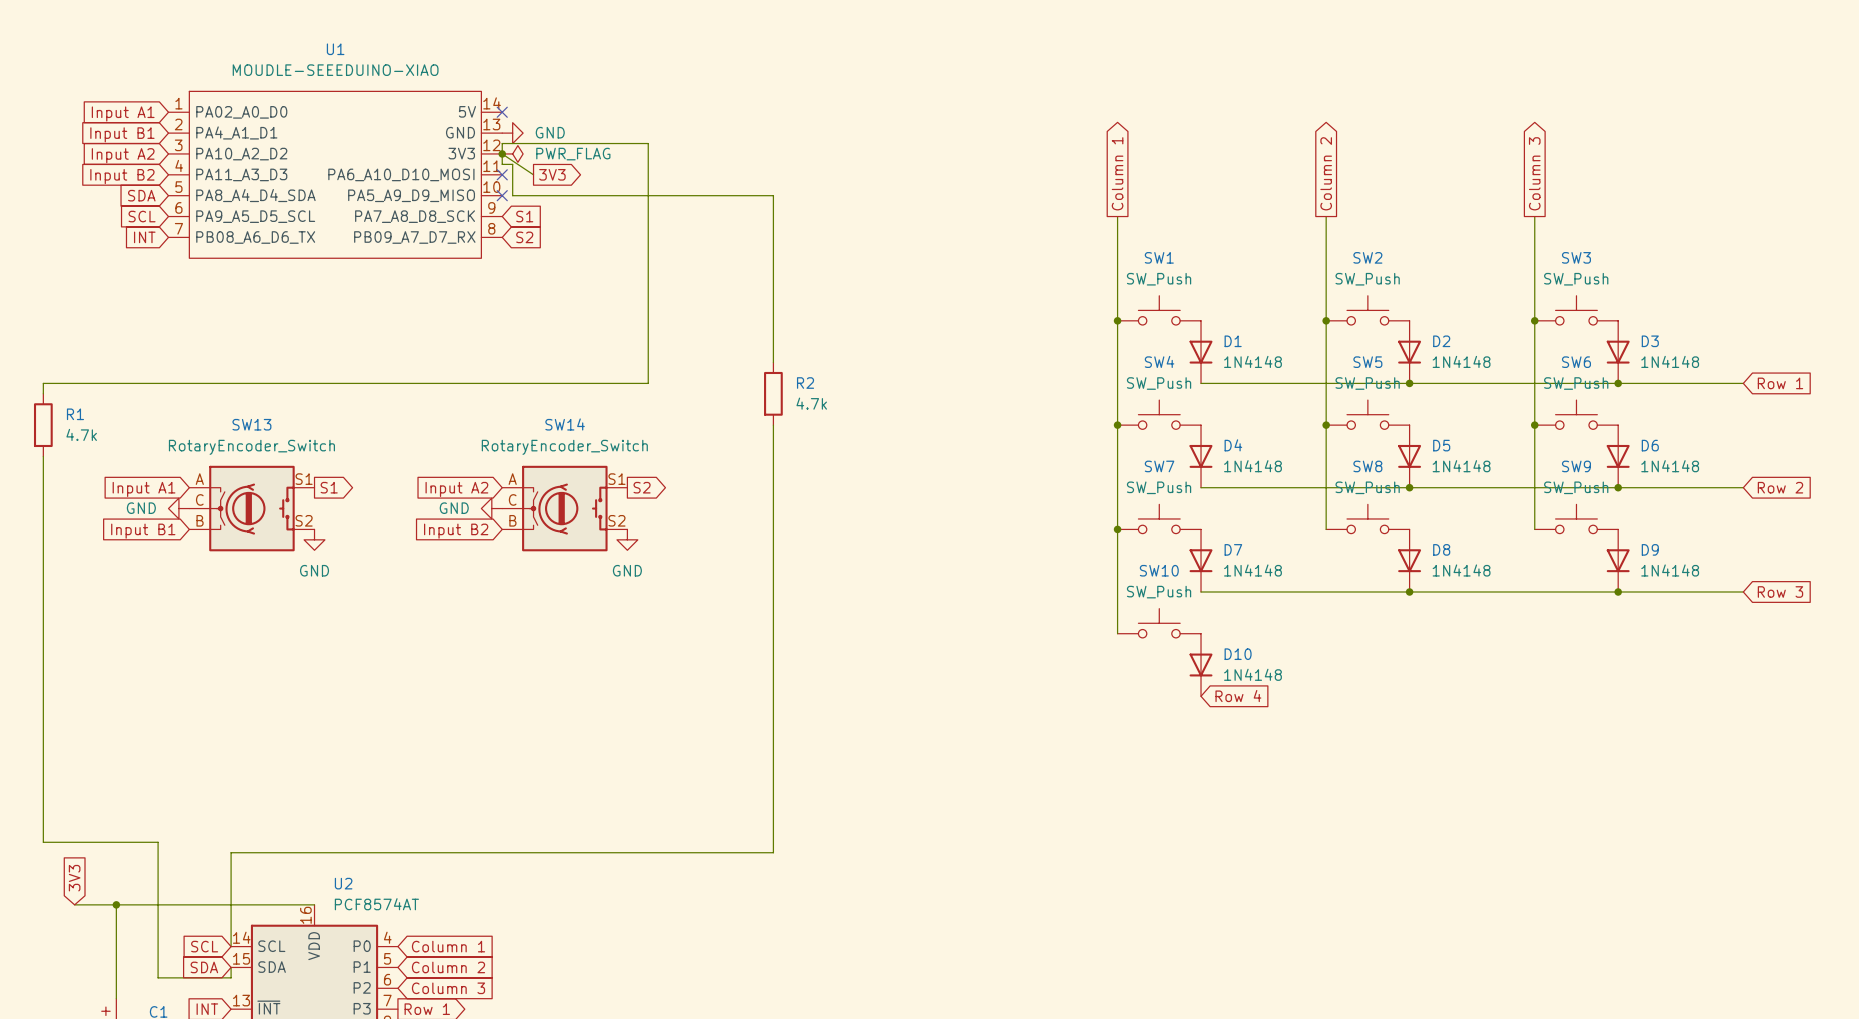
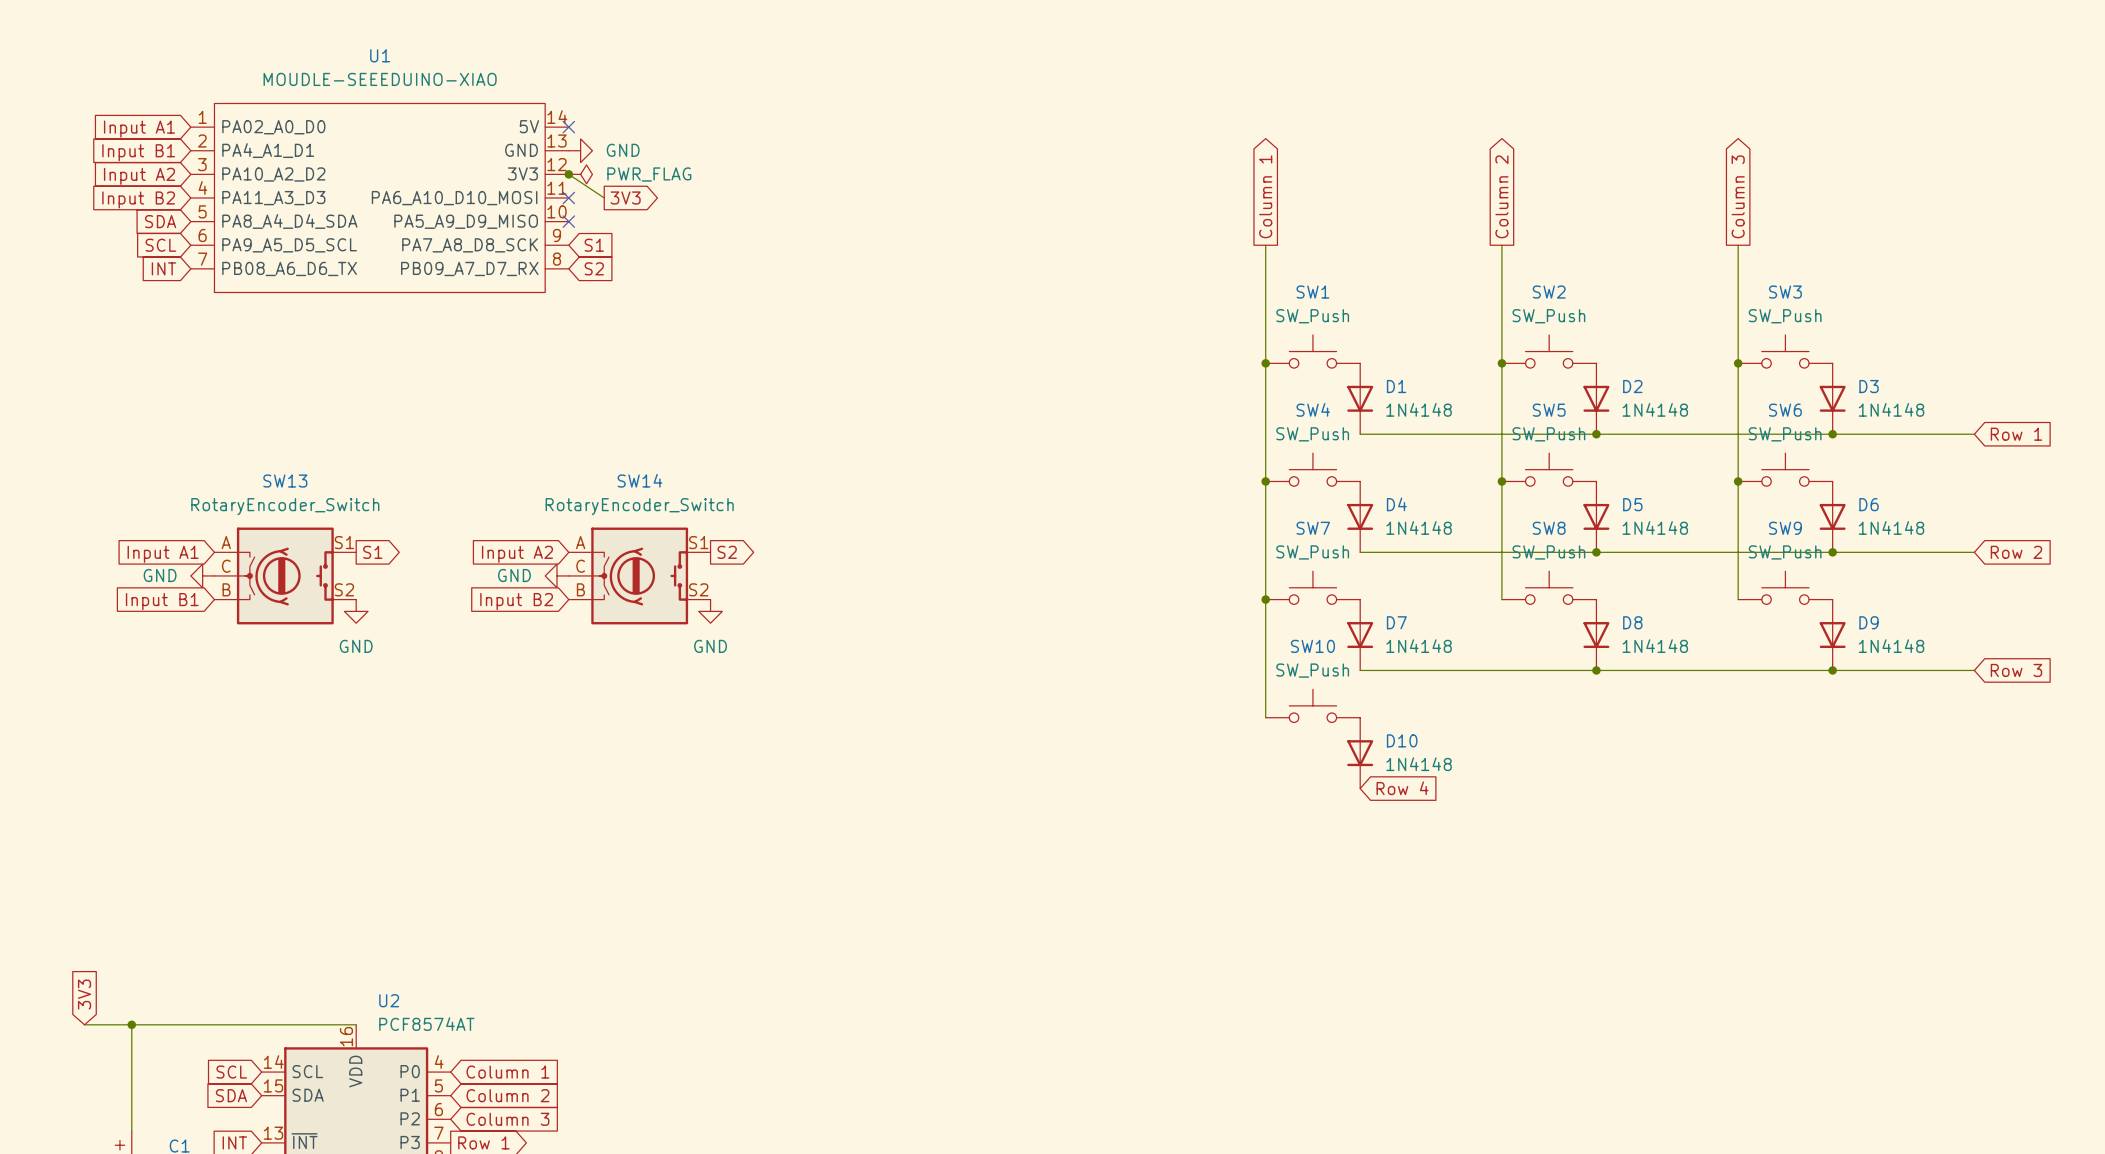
wire: (773, 362) (773, 195) (512, 195) (512, 164) (502, 164) (502, 143) (648, 143) (648, 383) (43, 383) (43, 393) -> none
R2: 4.7k (773, 393) -> none
R1: 4.7k (43, 425) -> none
wire: (773, 425) (773, 852) (231, 852) (231, 946) -> none
wire: (43, 456) (43, 842) (158, 842) (158, 977) (231, 977) (231, 967) -> none

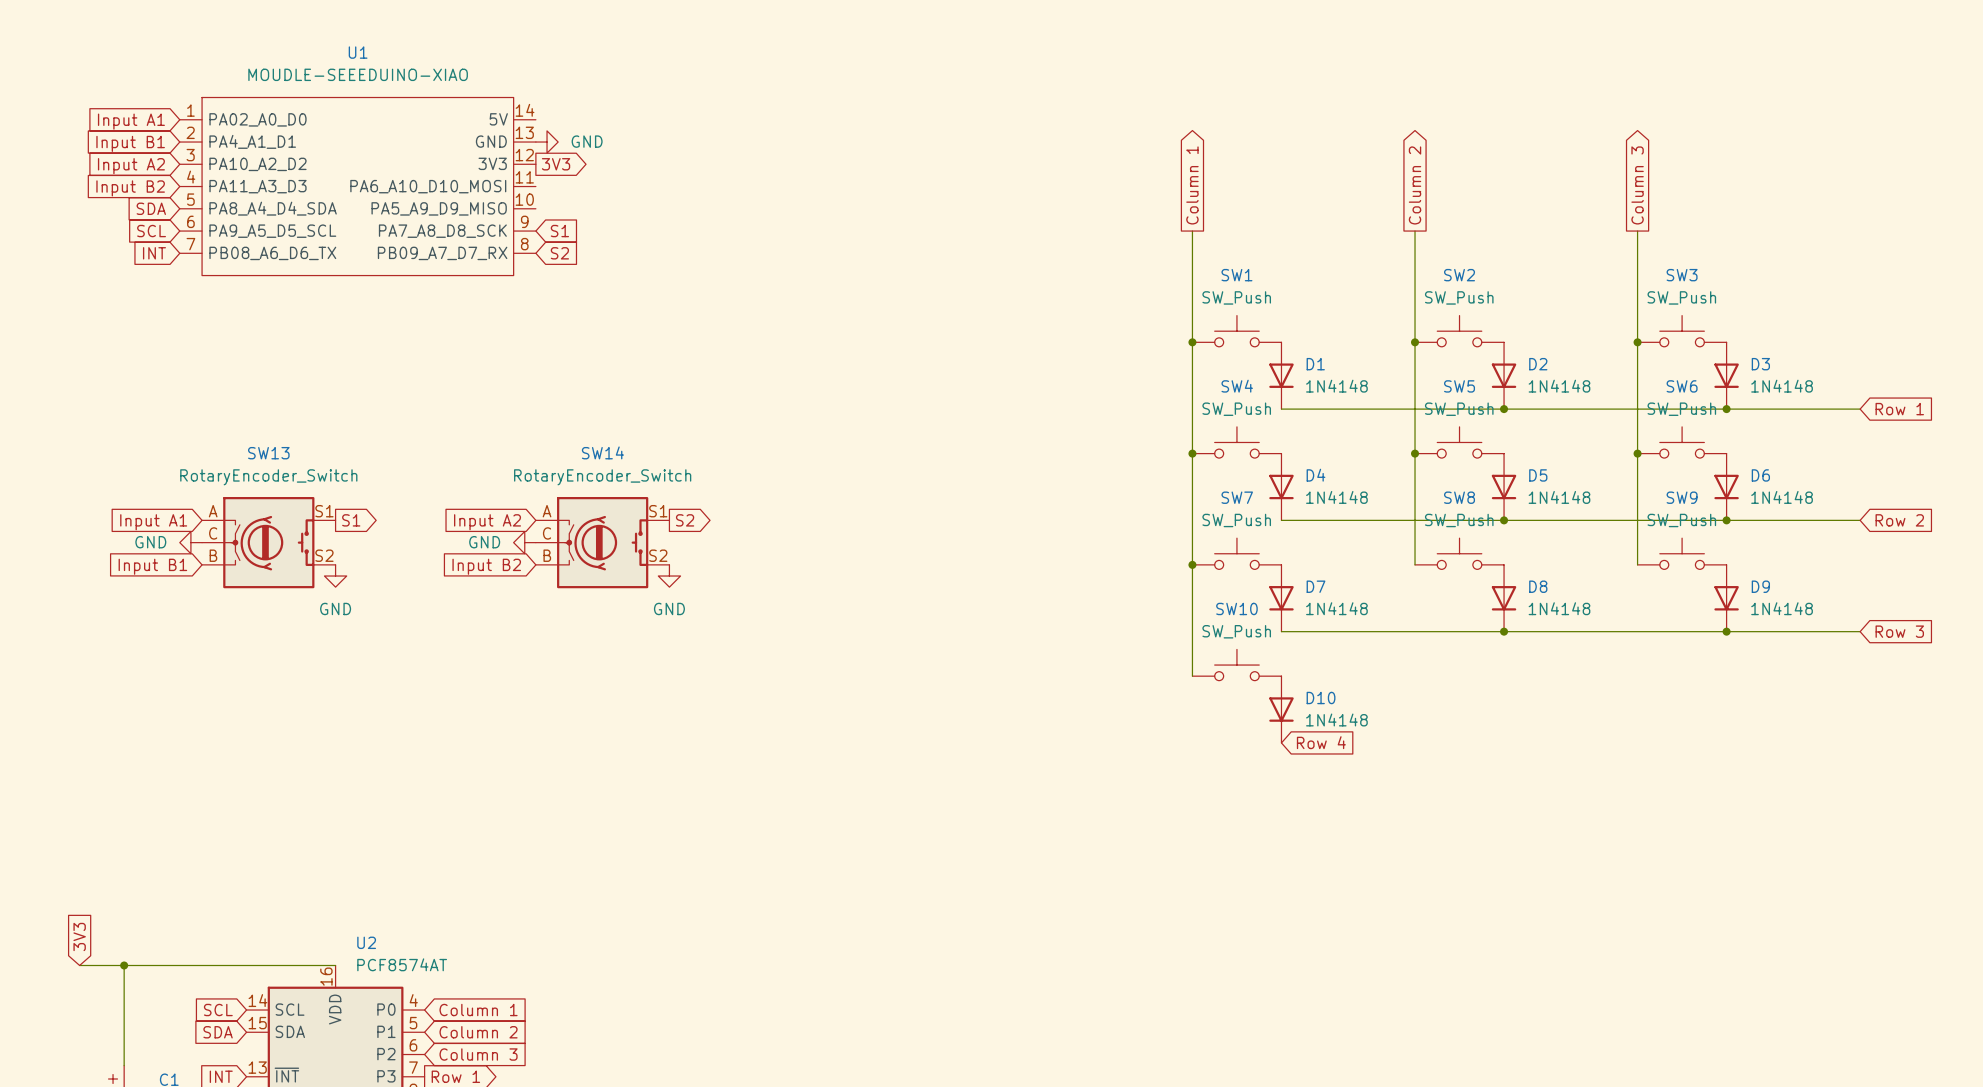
no-connect mark: (568, 127) -> none
wire: (568, 174) (604, 197) -> none
junction: (568, 174) -> none
power symbol: PWR_FLAG (580, 174) -> none
no-connect mark: (568, 197) -> none
global label position: 3V3 (625, 197) -> 3V3 (556, 164)
no-connect mark: (568, 221) -> none

